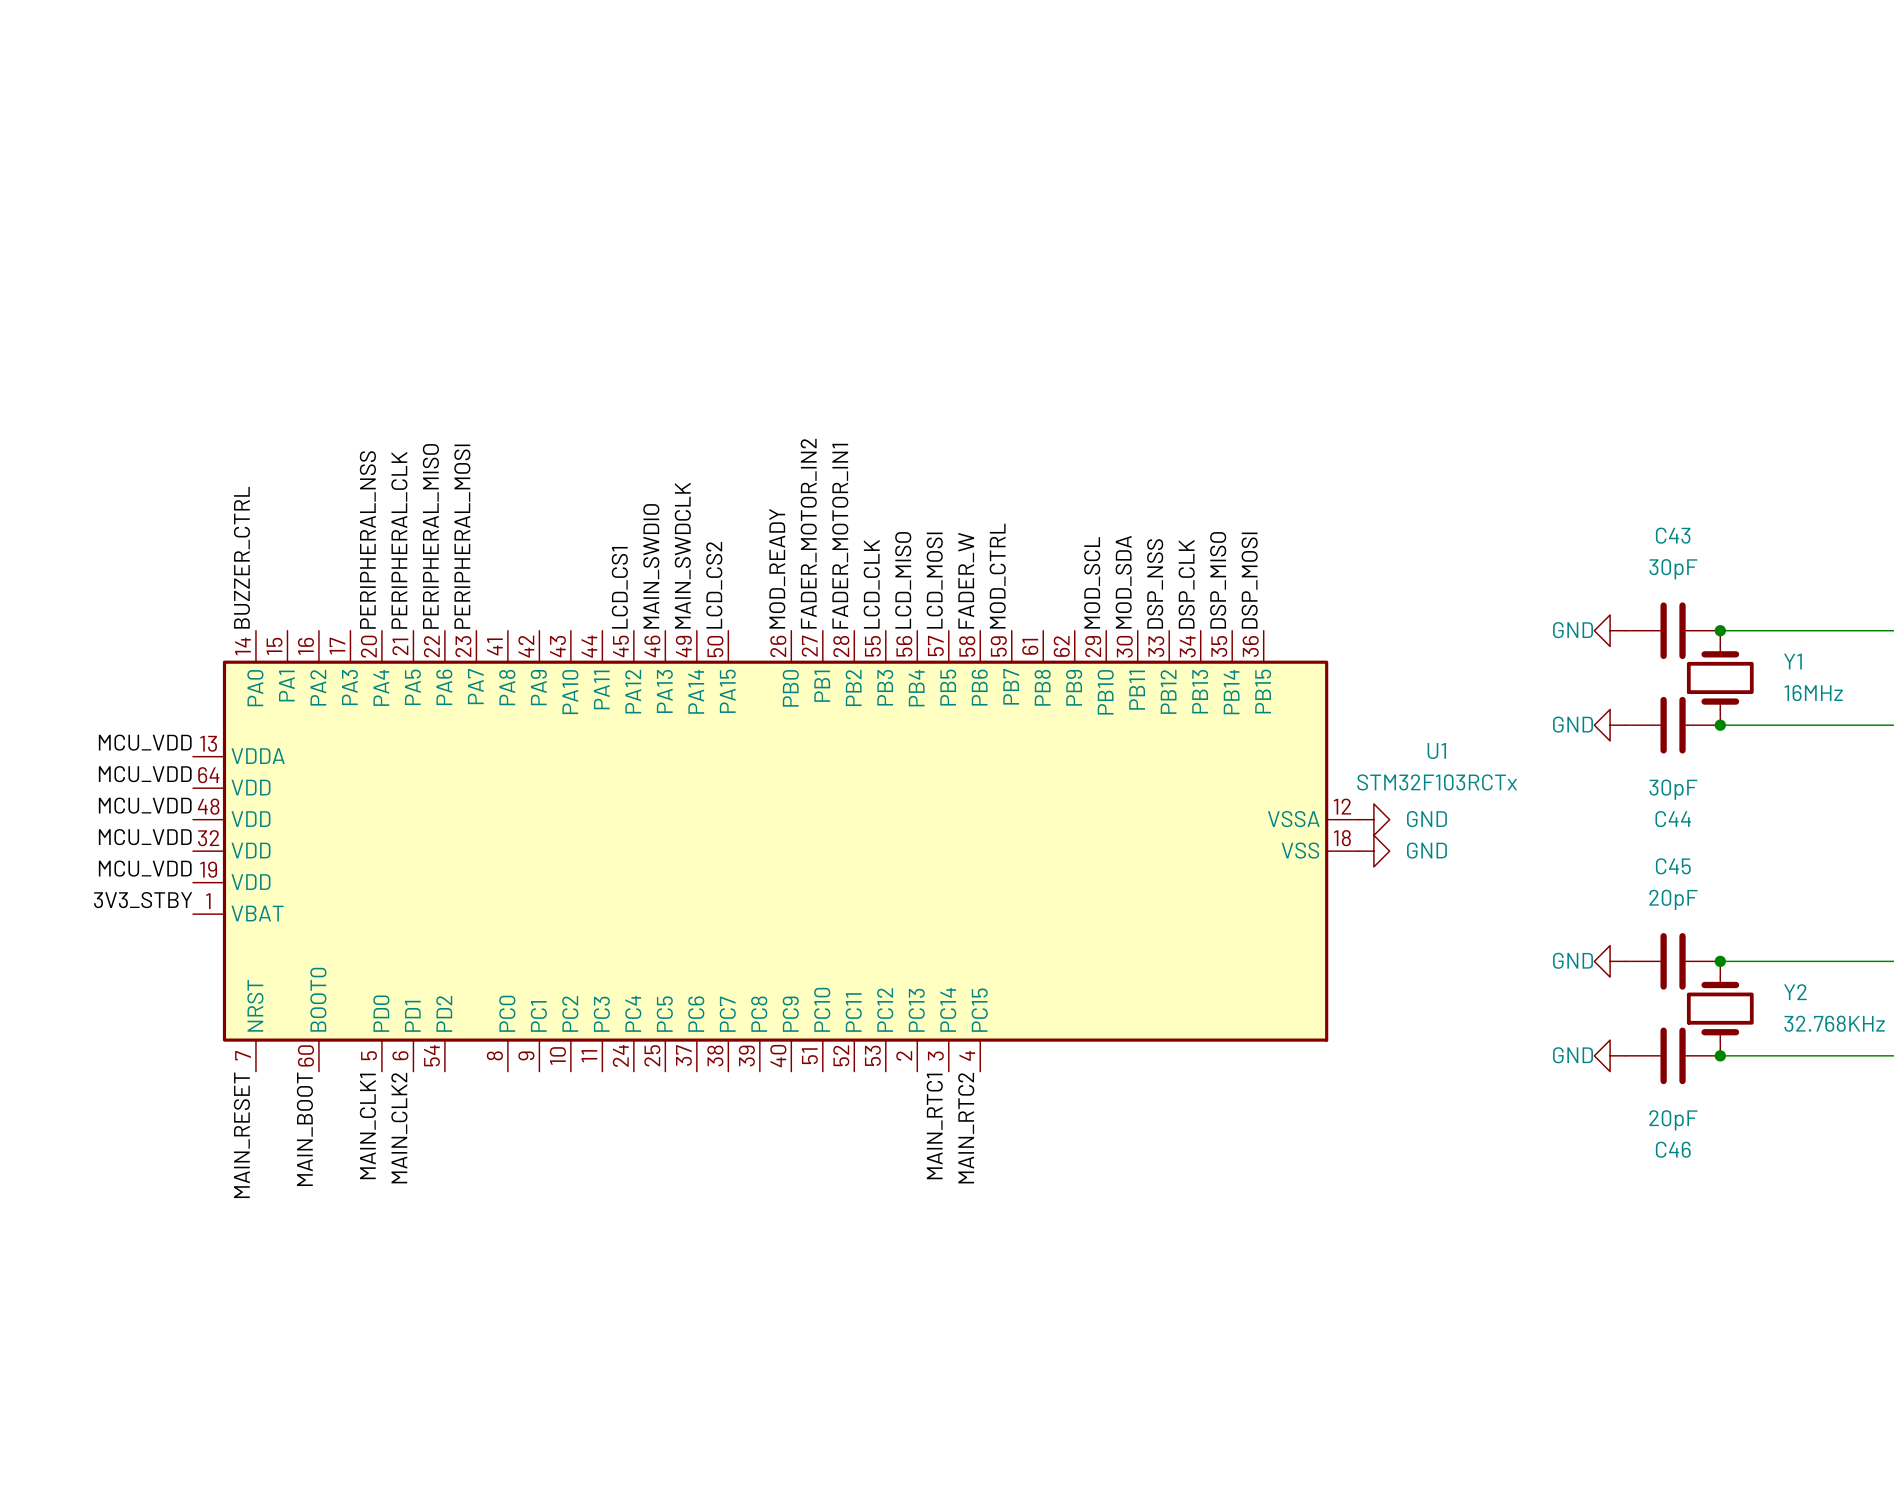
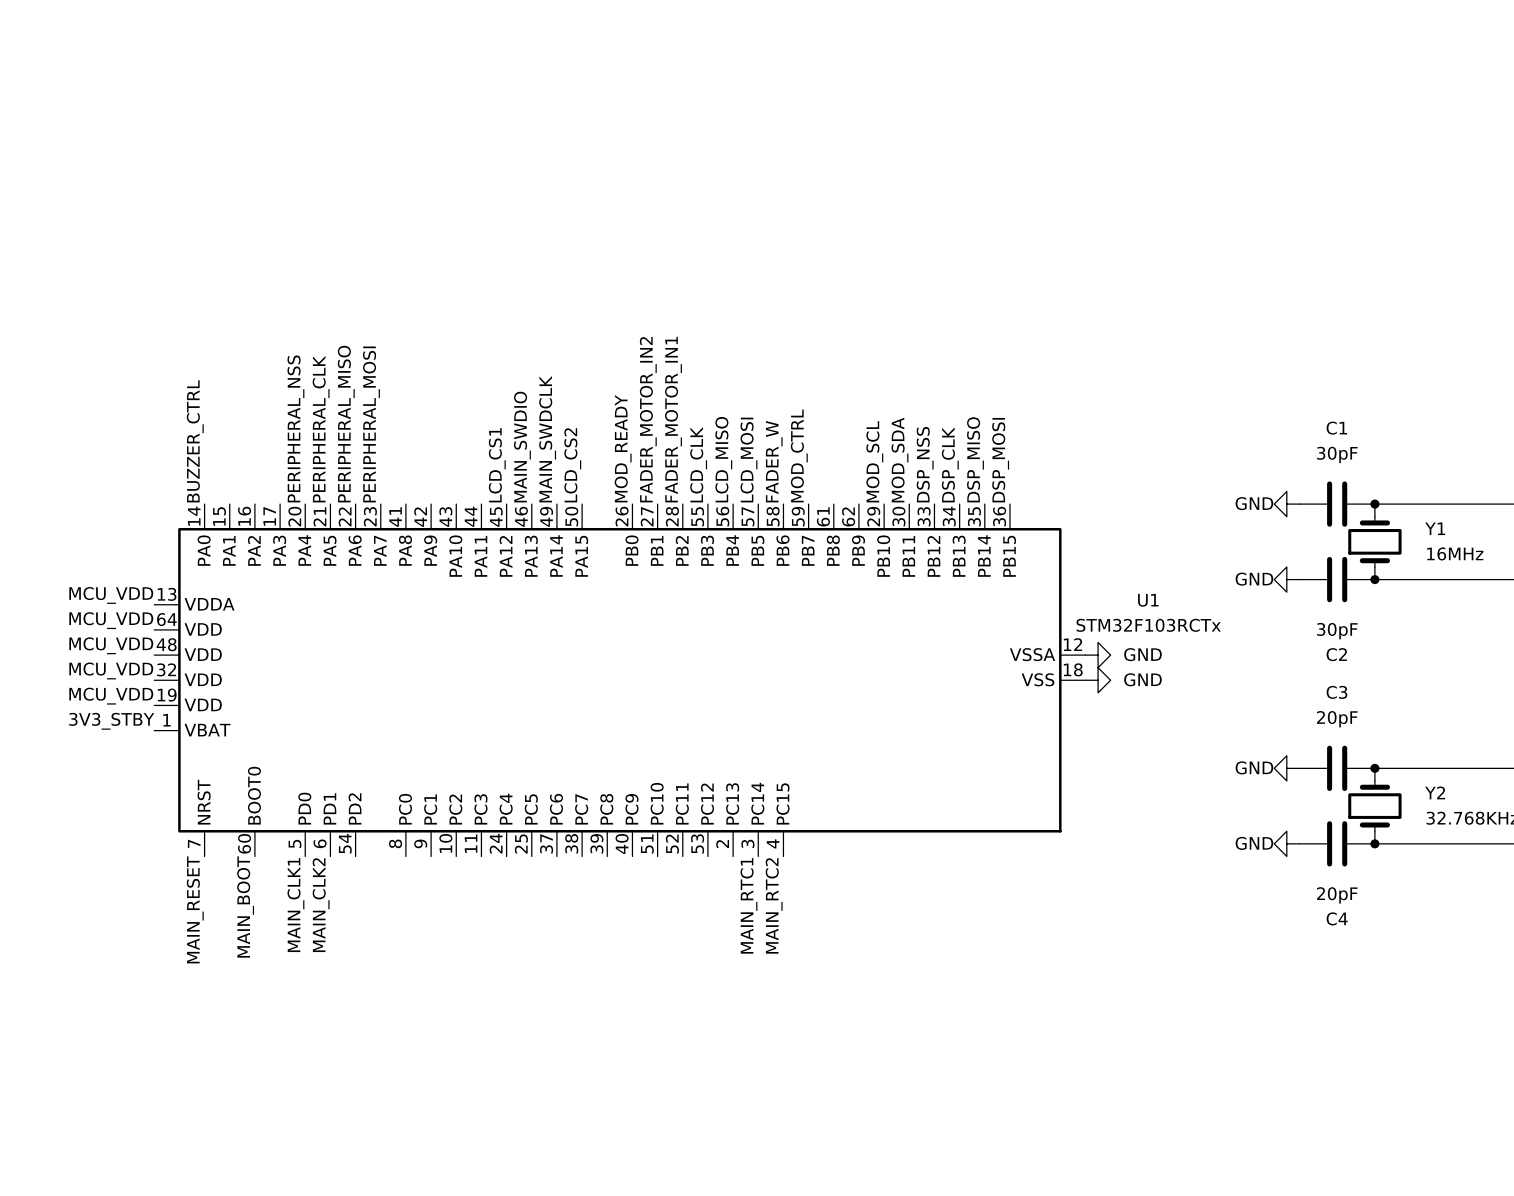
C43 name: C43 (1673, 535) -> C1 (1336, 428)
C44 name: C44 (1673, 819) -> C2 (1336, 654)
C45 name: C45 (1673, 866) -> C3 (1336, 692)
C46 name: C46 (1673, 1149) -> C4 (1337, 918)

